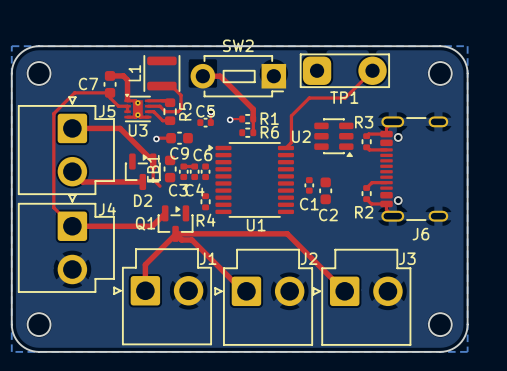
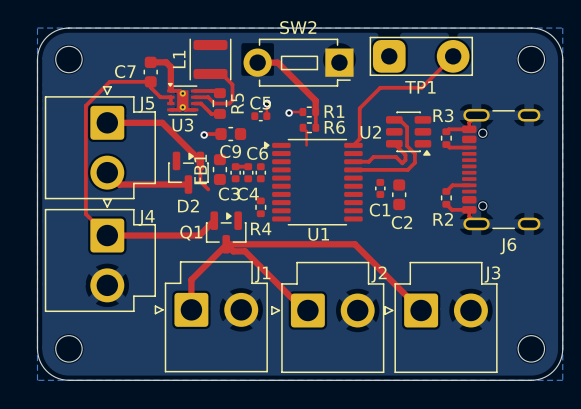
top track: none -> (394, 119) (399, 119) (407, 127) (407, 145) (414, 153) (414, 162) (407, 169) (359, 169)
top track: none -> (302, 127) (306, 131) (306, 145)
top track: none -> (394, 143) (405, 154) (405, 160) (402, 163) (396, 157) (373, 157) (368, 161) (359, 161)

